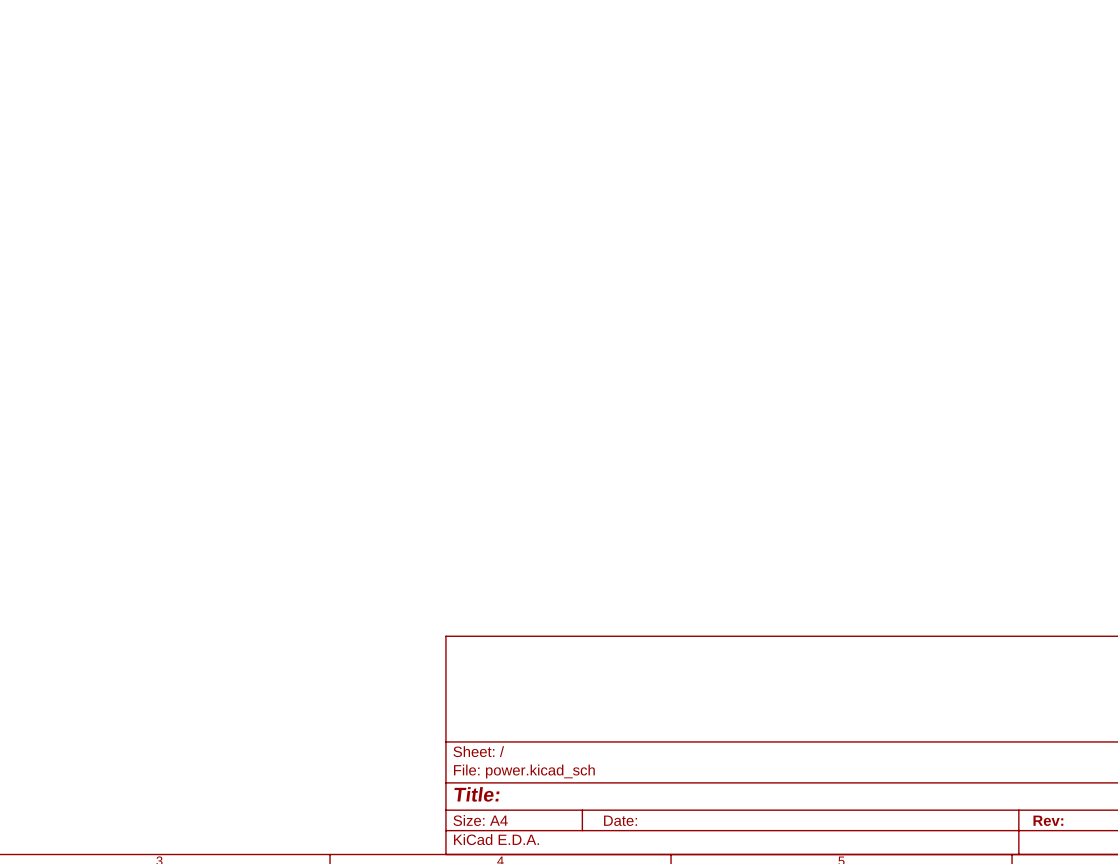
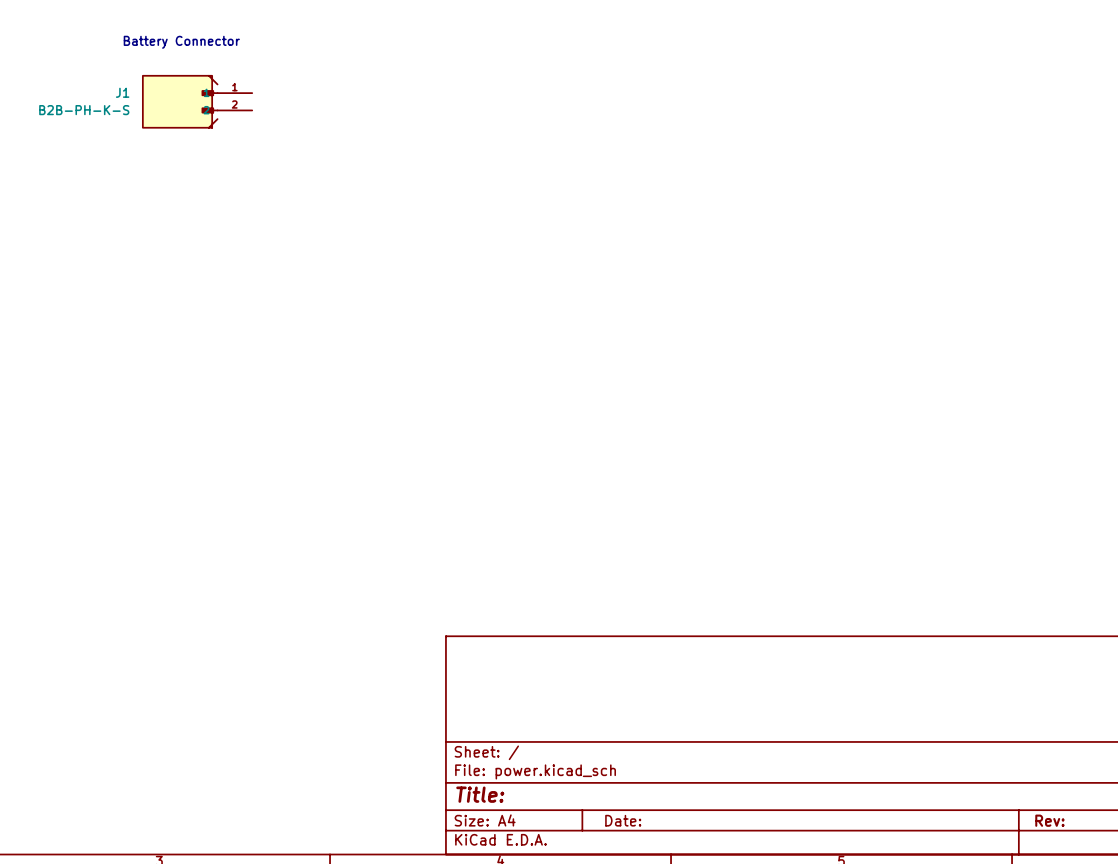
text: none -> Battery Connector (181, 42)
J1: none -> B2B-PH-K-S (197, 101)

